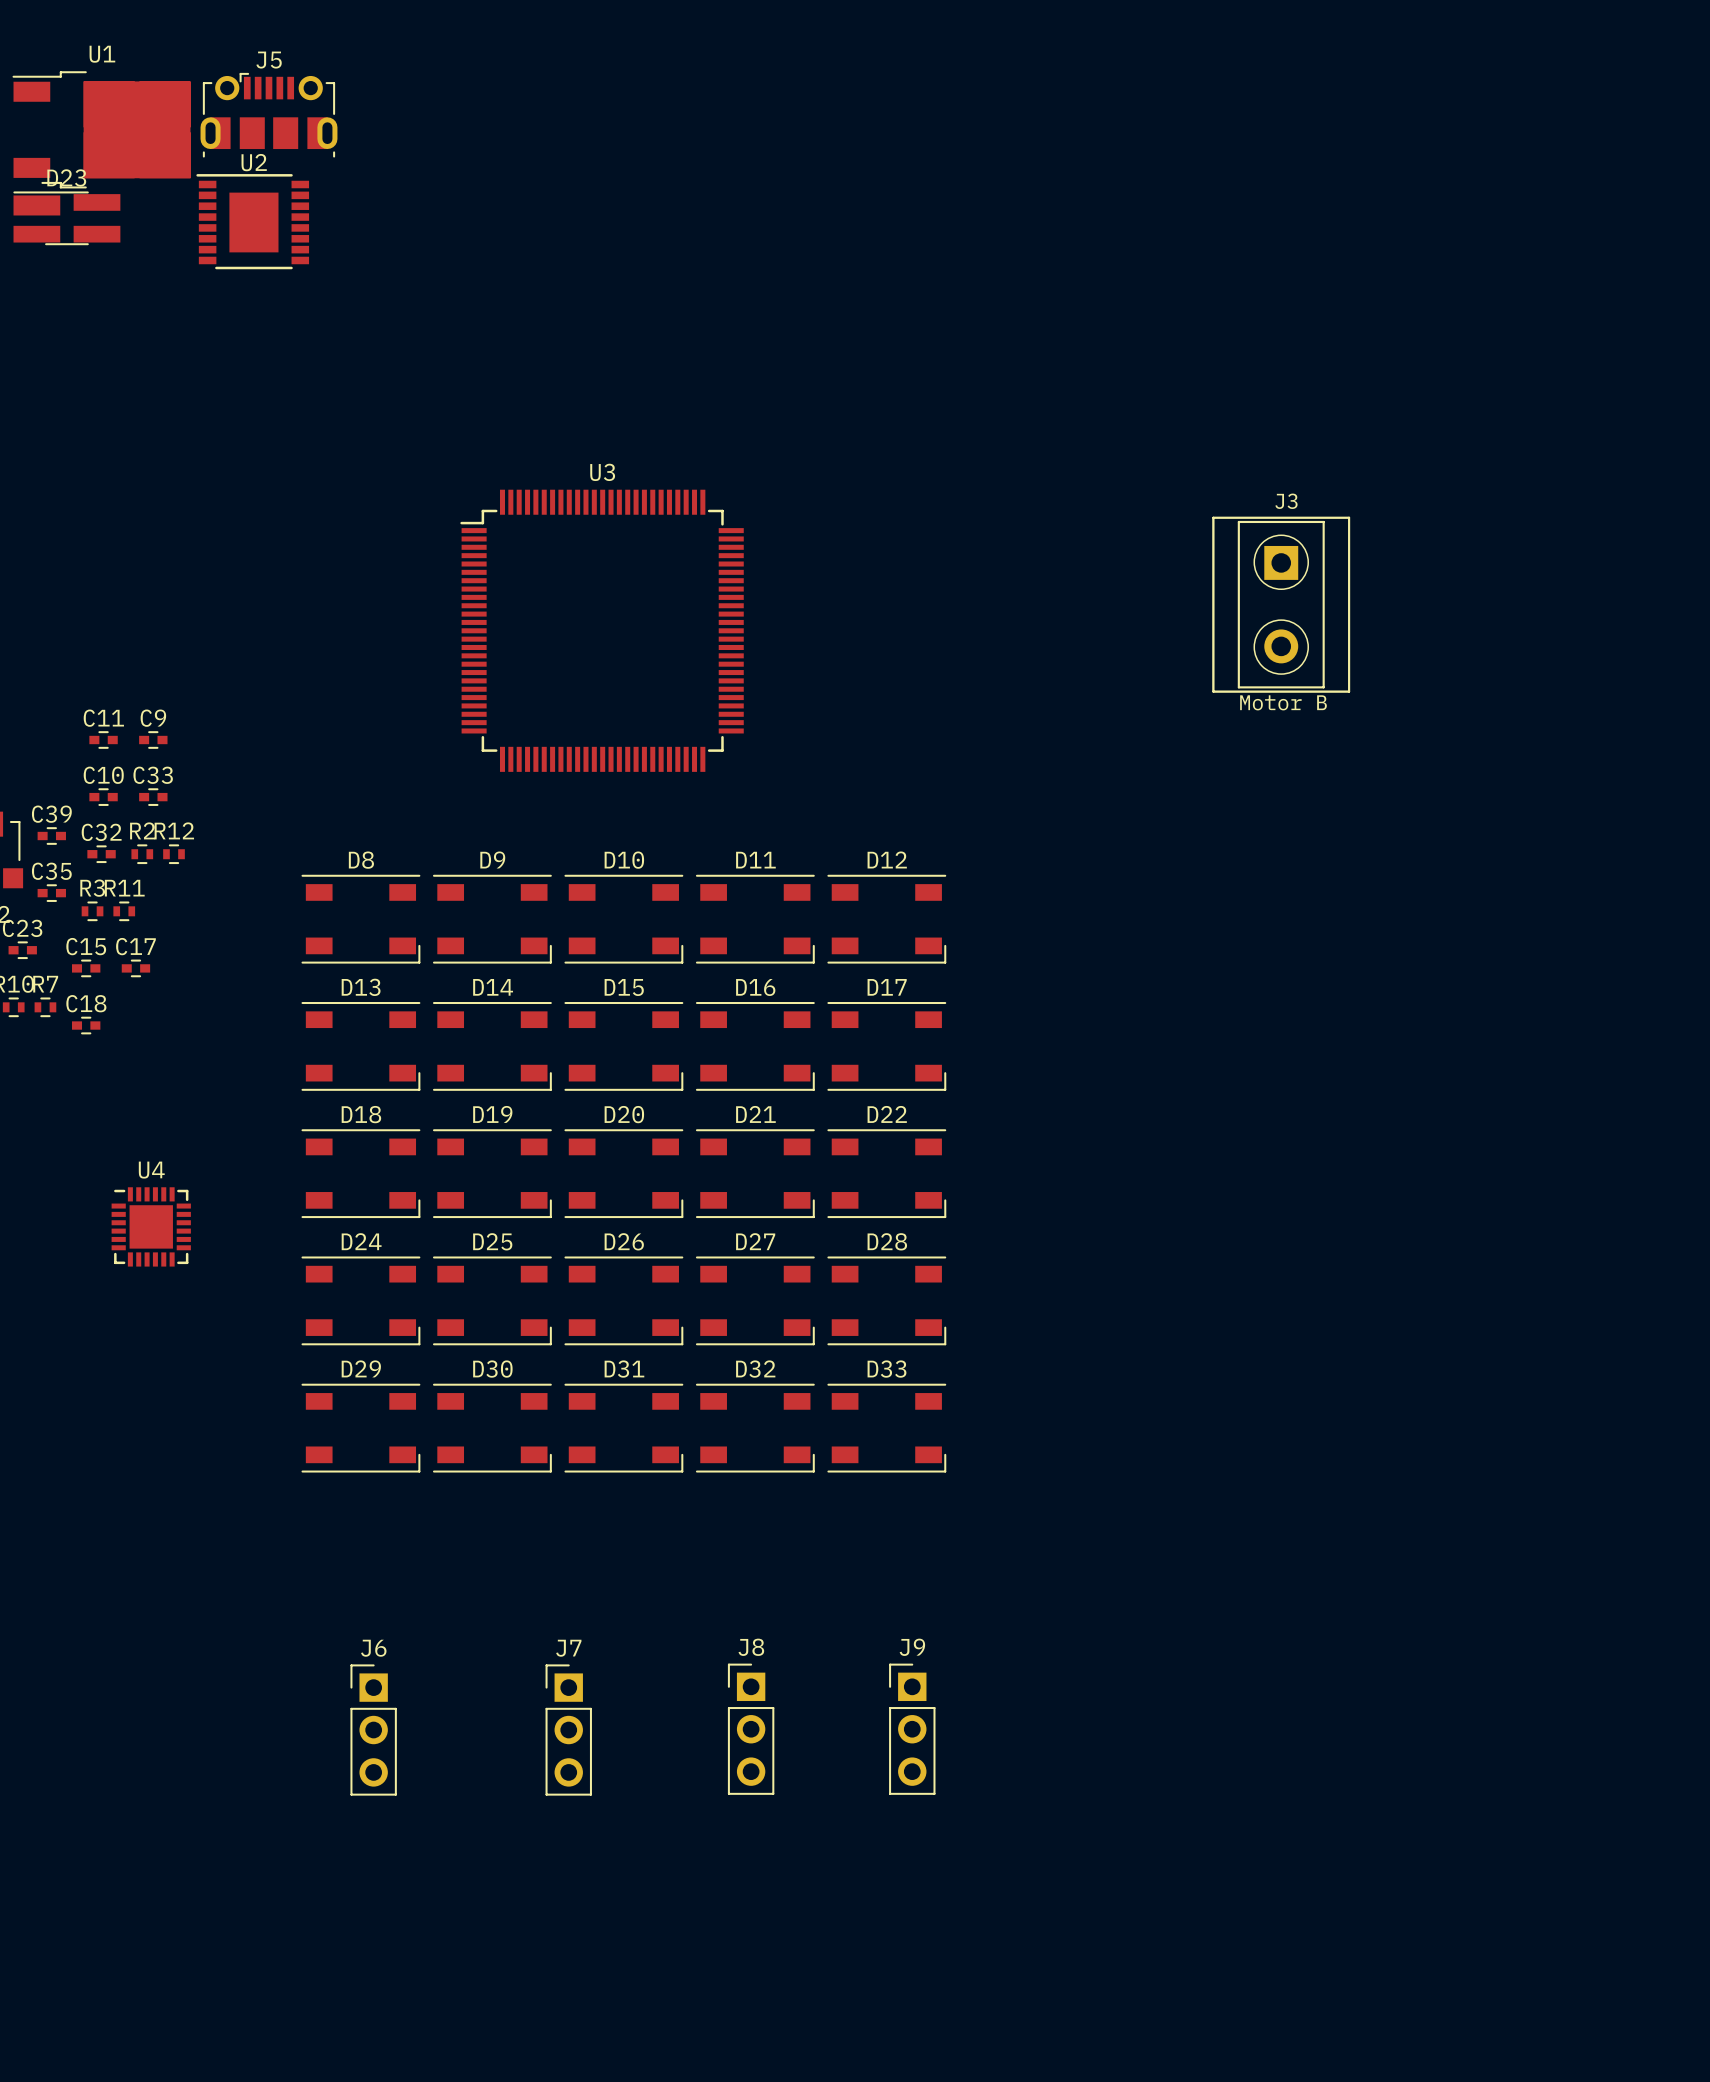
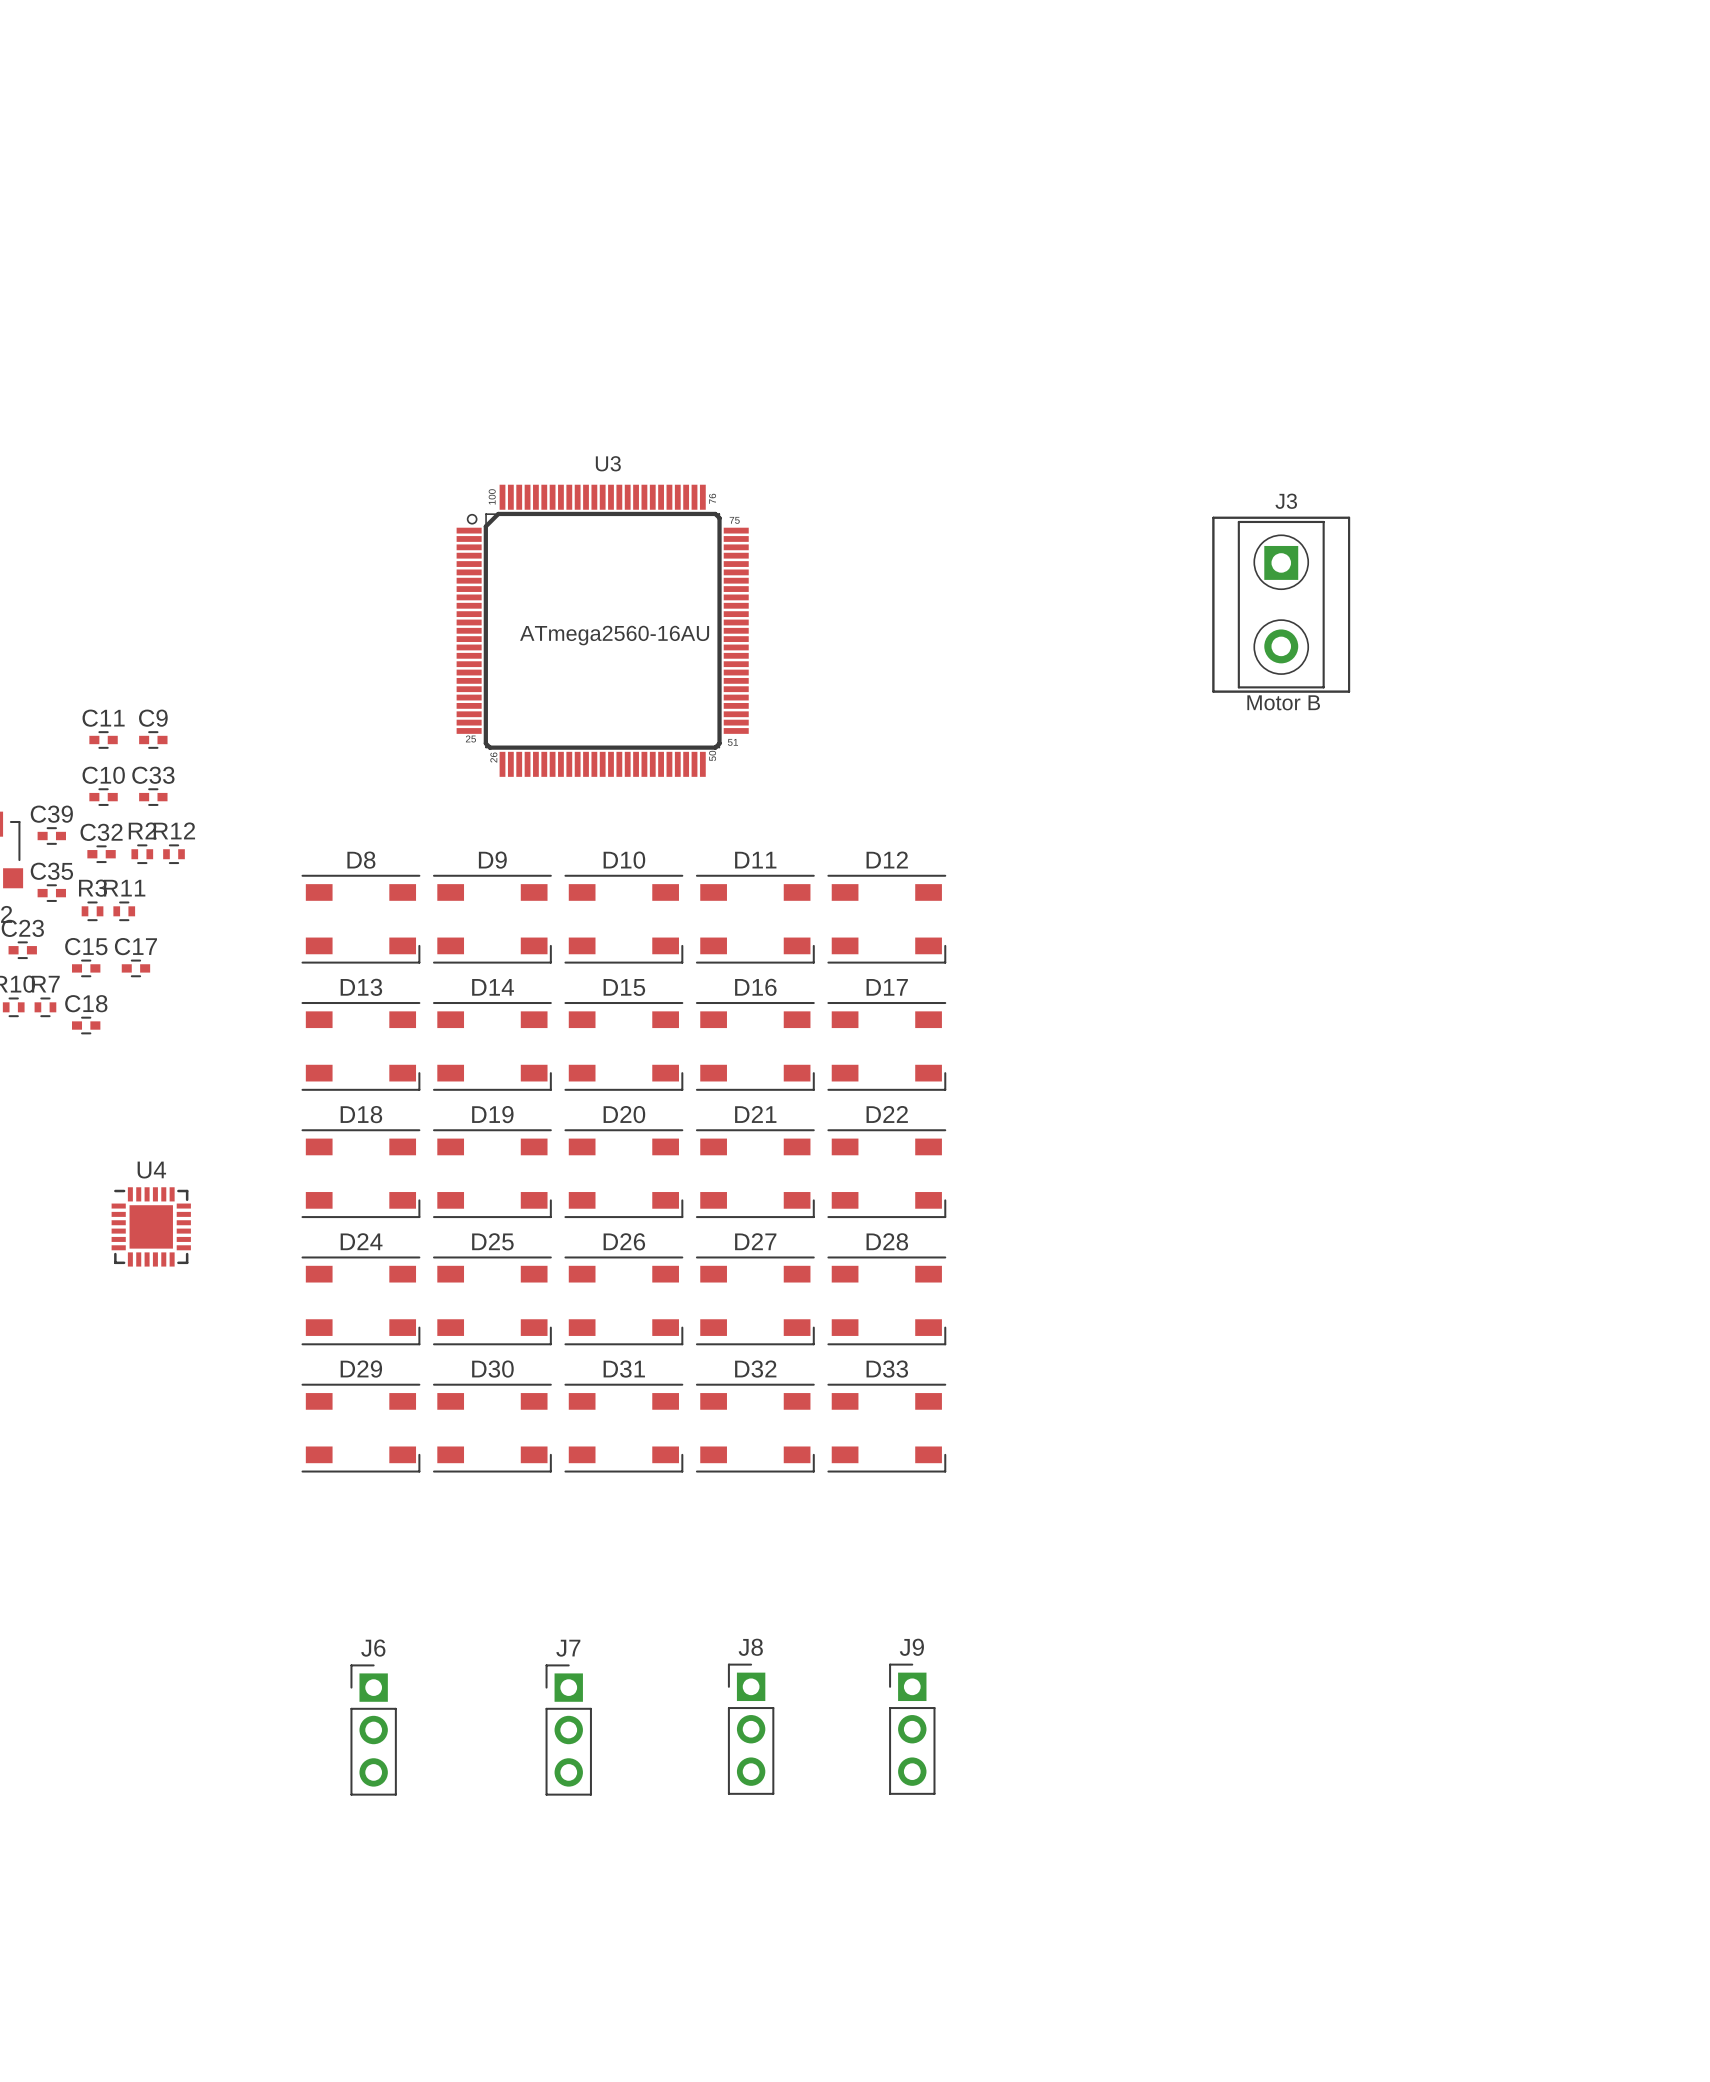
J5: (268, 115) -> none
U1: (101, 129) -> none
D23: (66, 218) -> none
U2: (252, 221) -> none
U3 footprint: [460, 489, 744, 772] -> [456, 484, 749, 777]
U3 value: none -> ATmega2560-16AU (614, 635)

